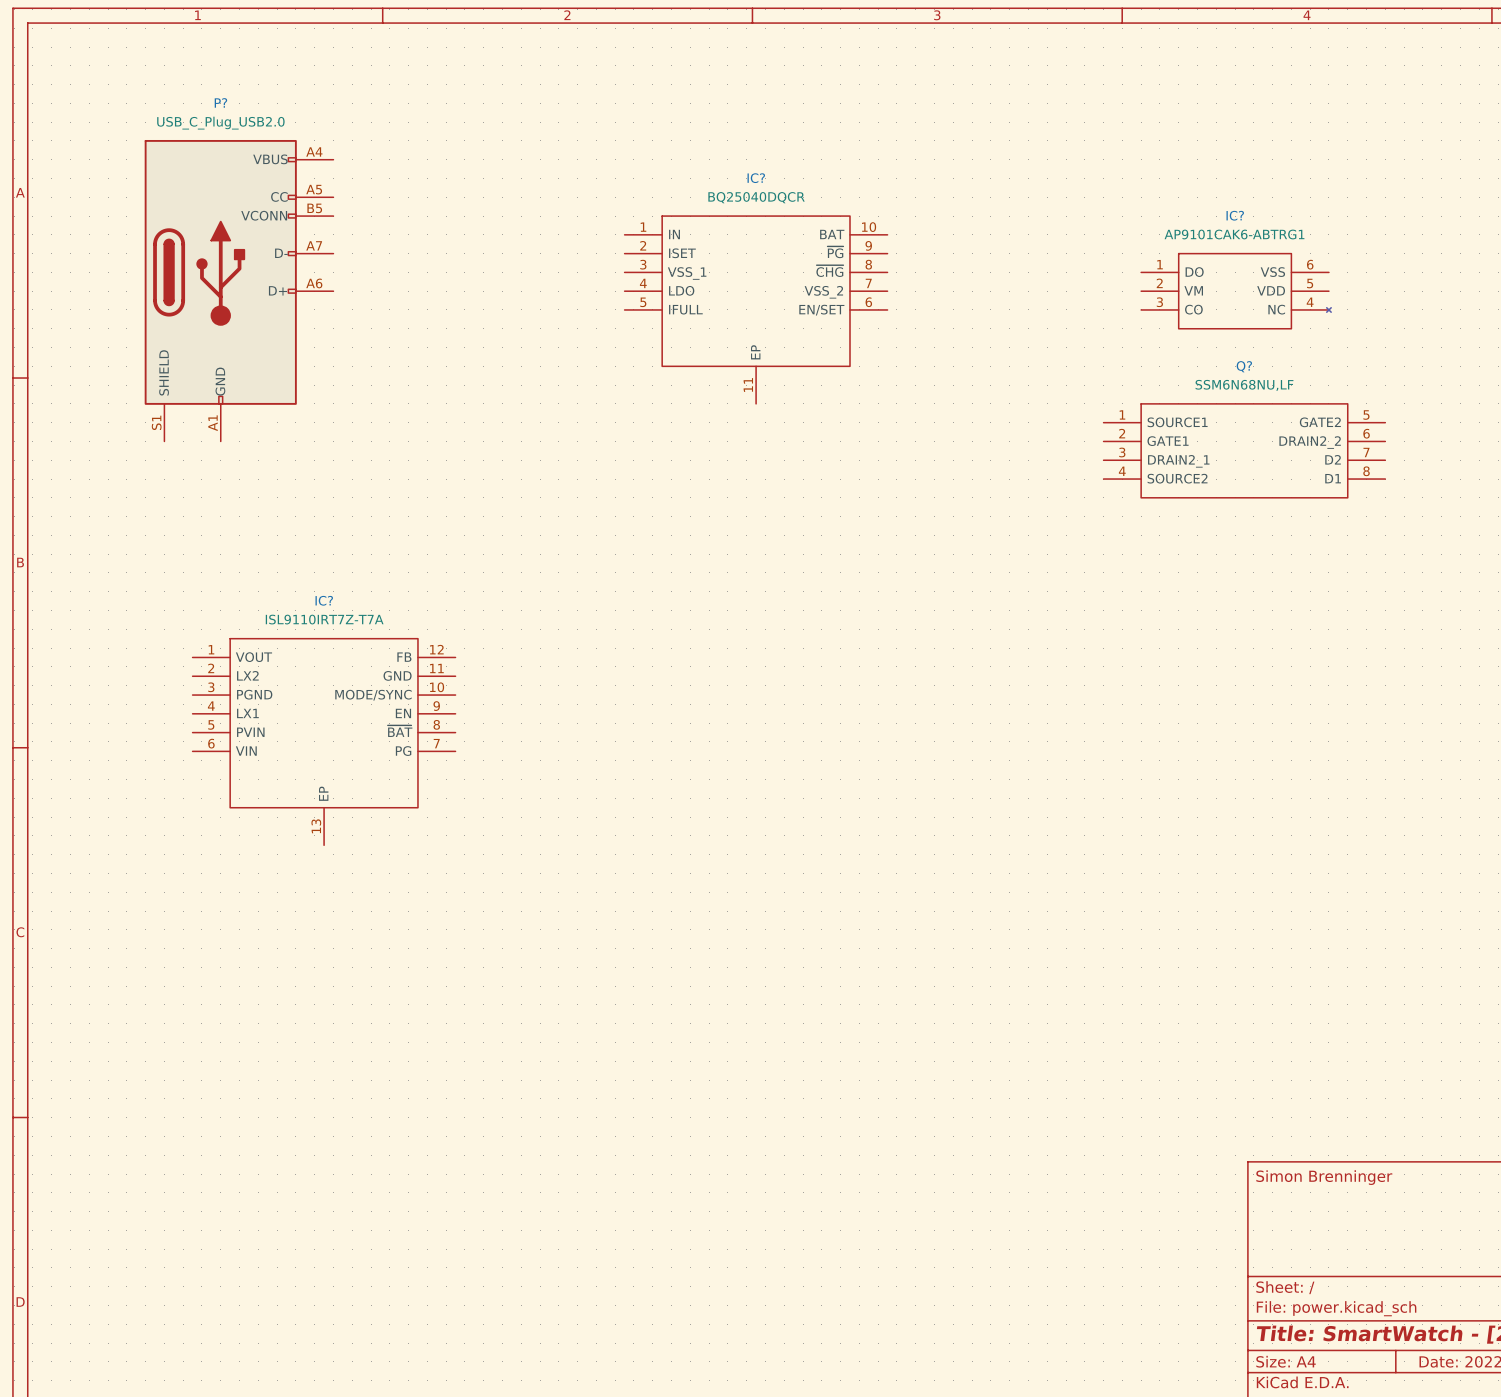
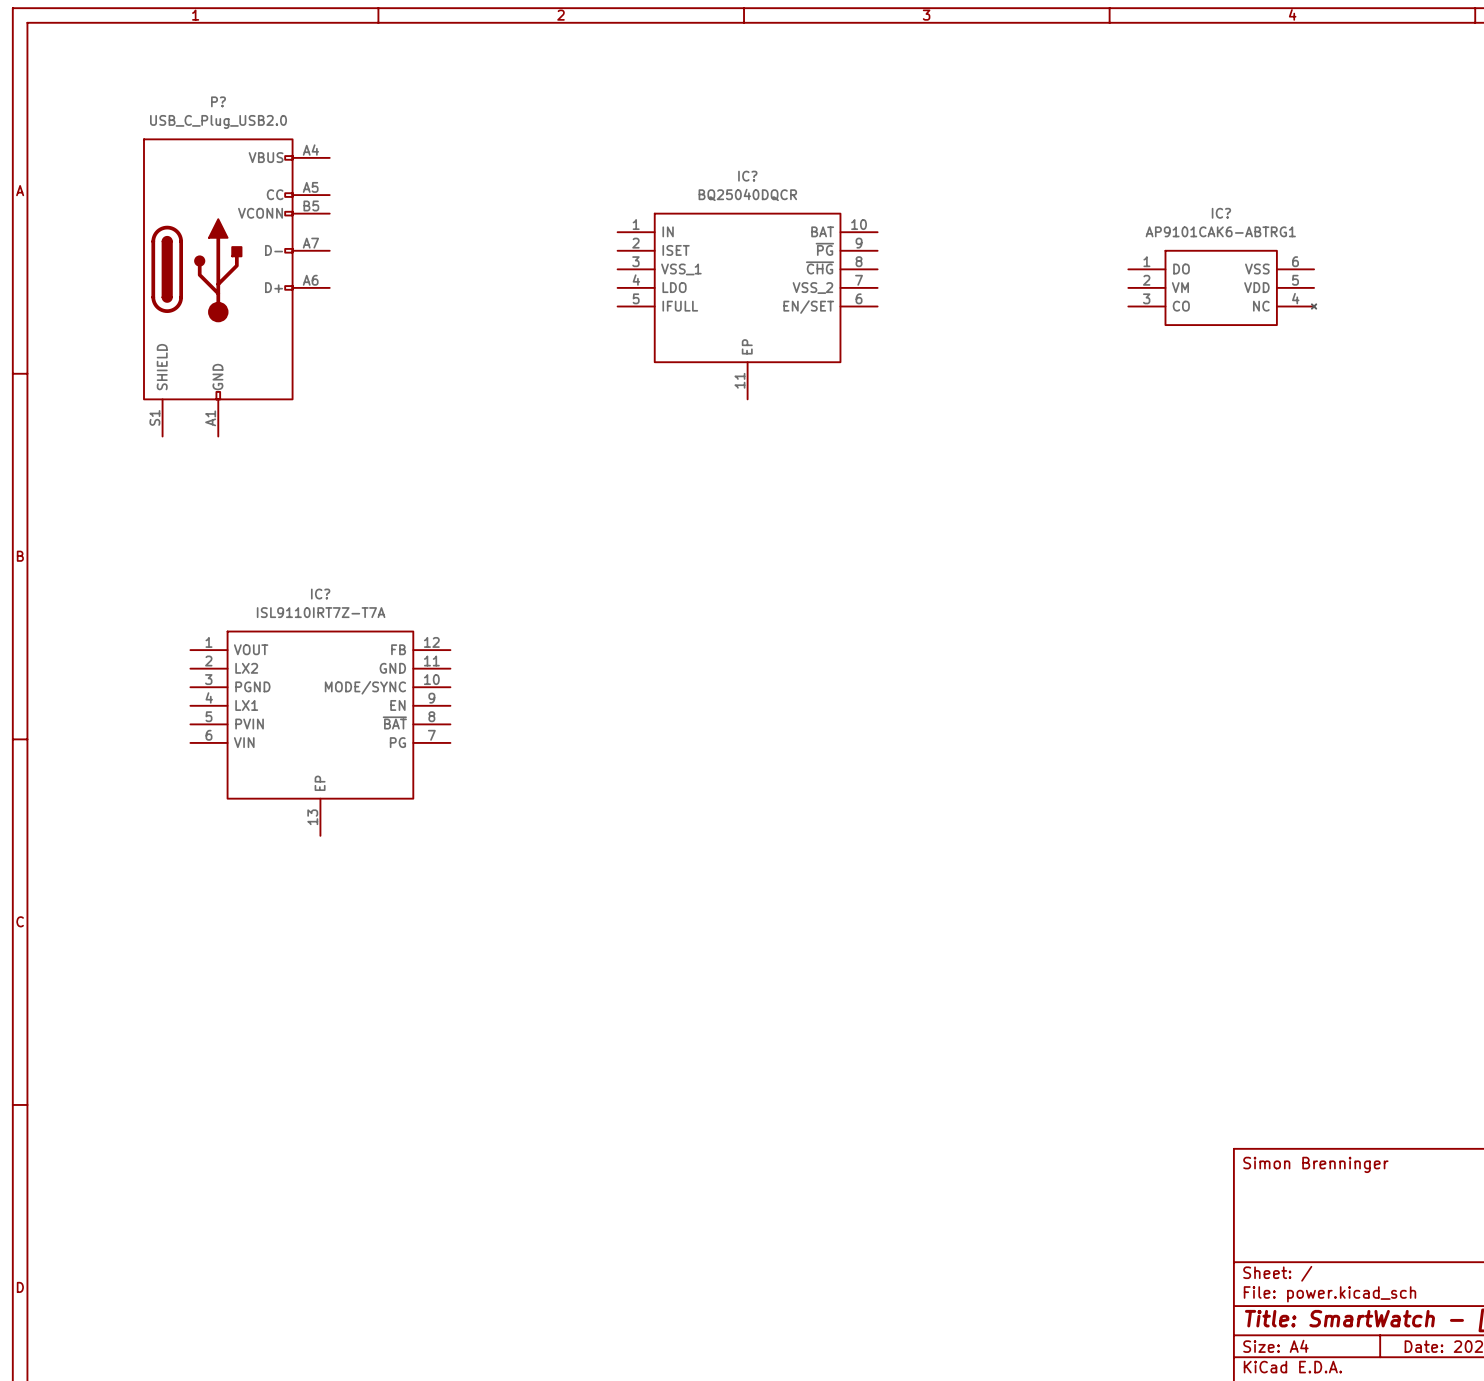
Q?: SSM6N68NU,LF (1244, 450) -> none

